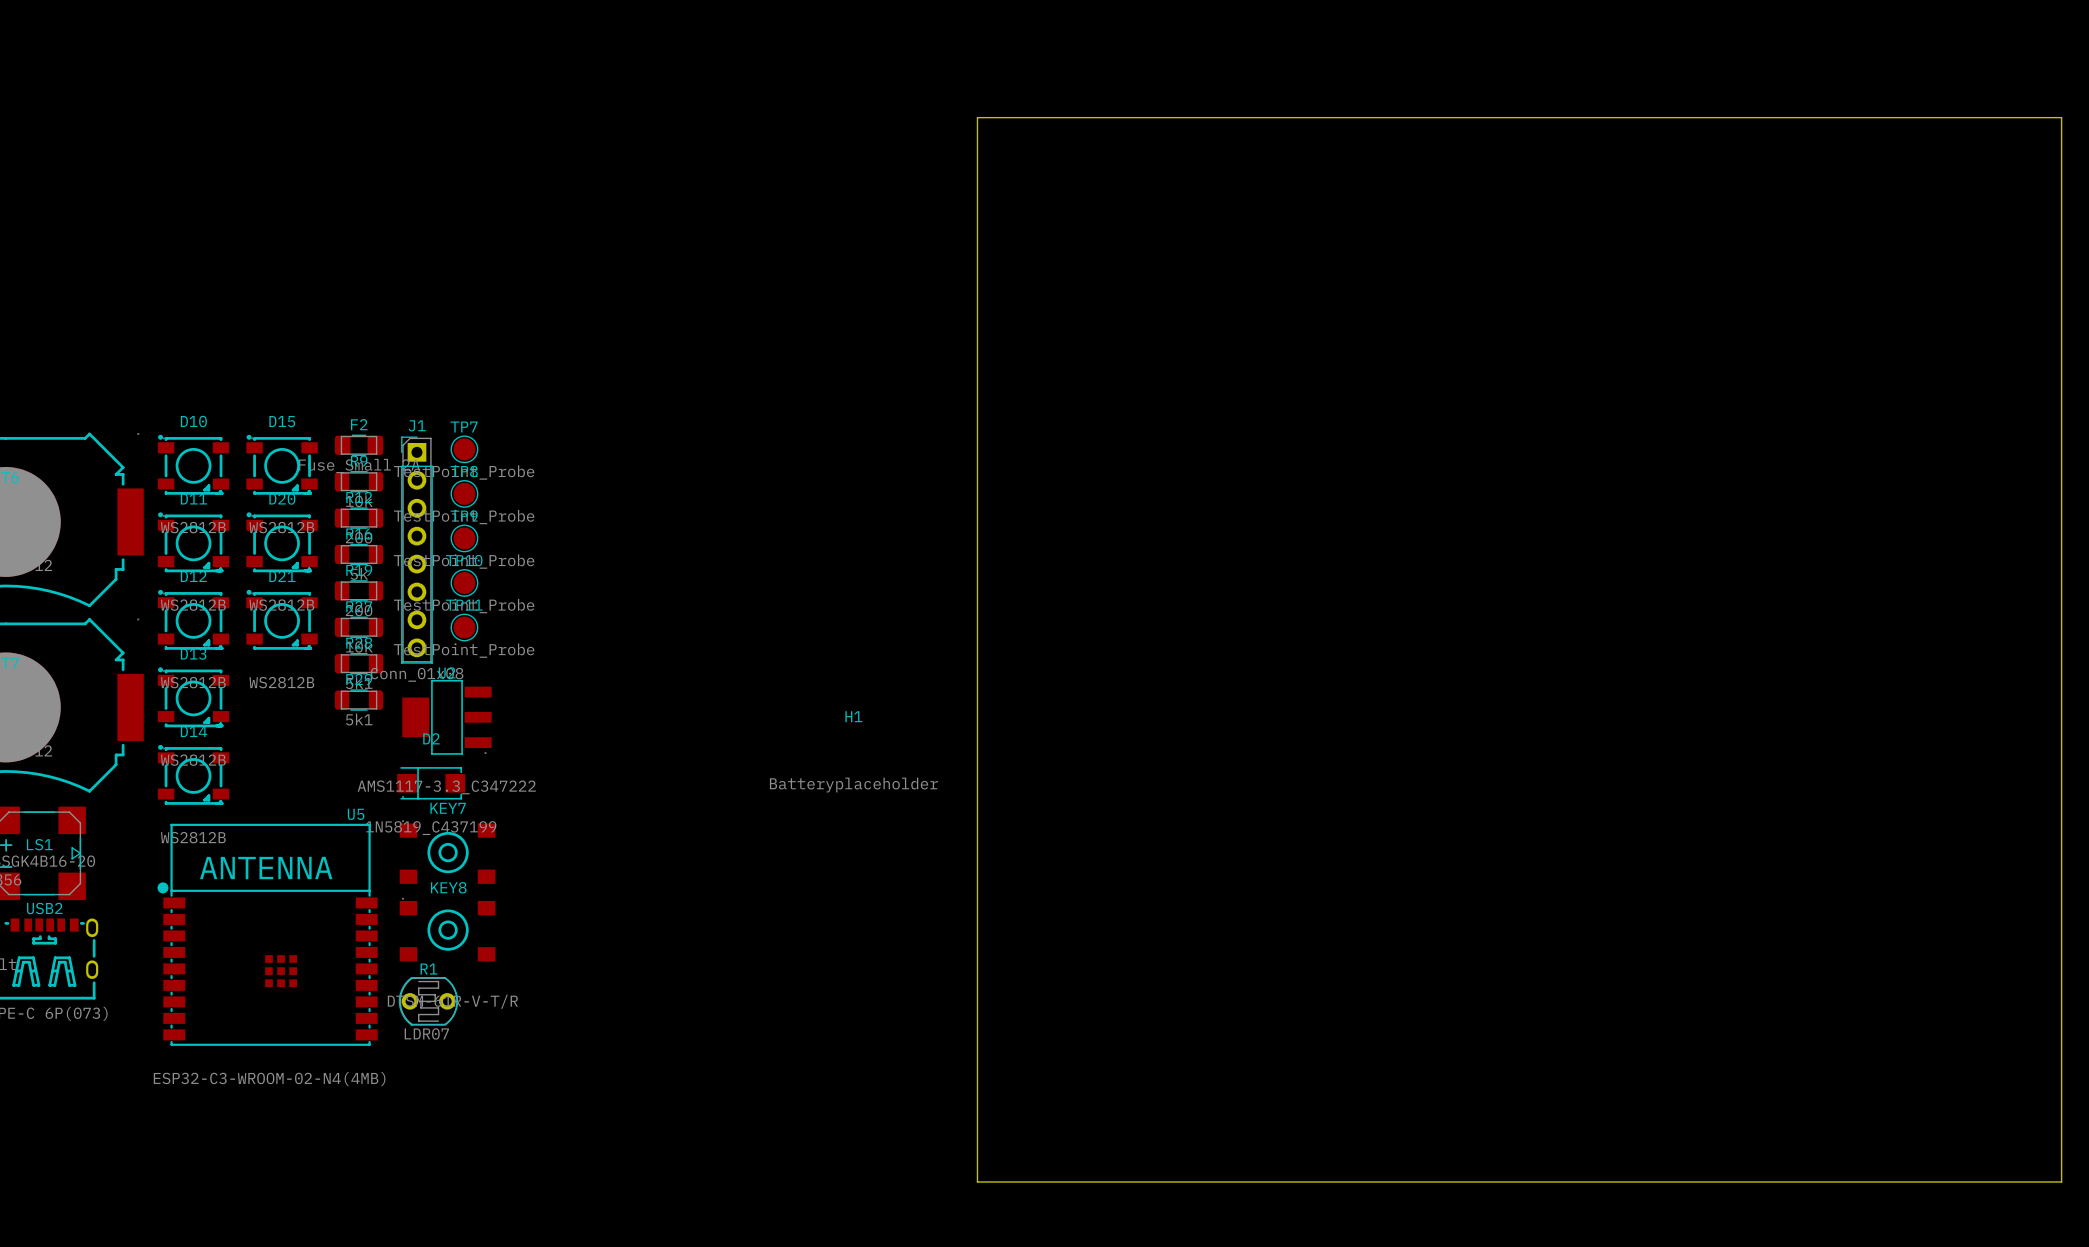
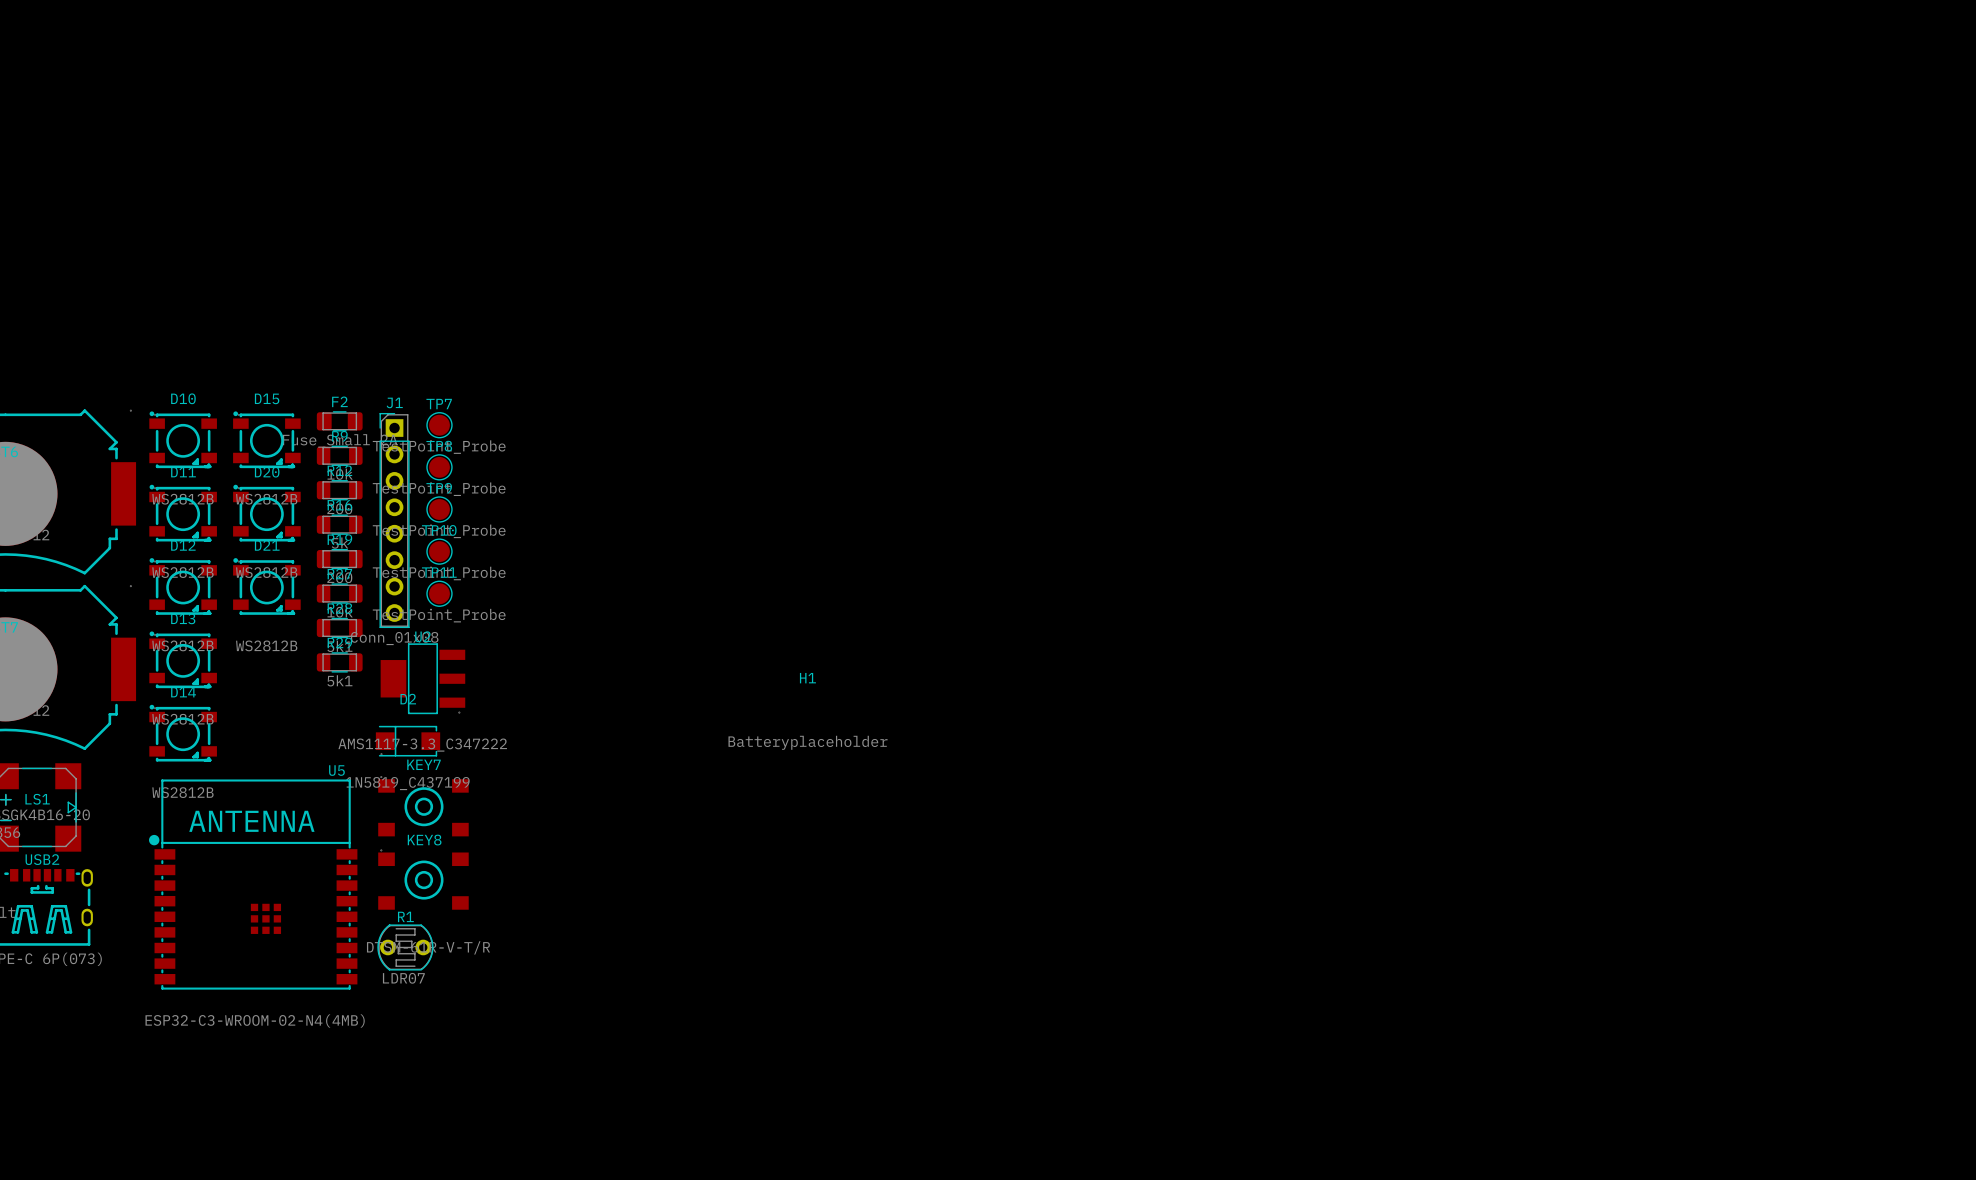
board edge: (977, 117) (2061, 117) (2061, 1181) (977, 1181) (977, 117) -> none

